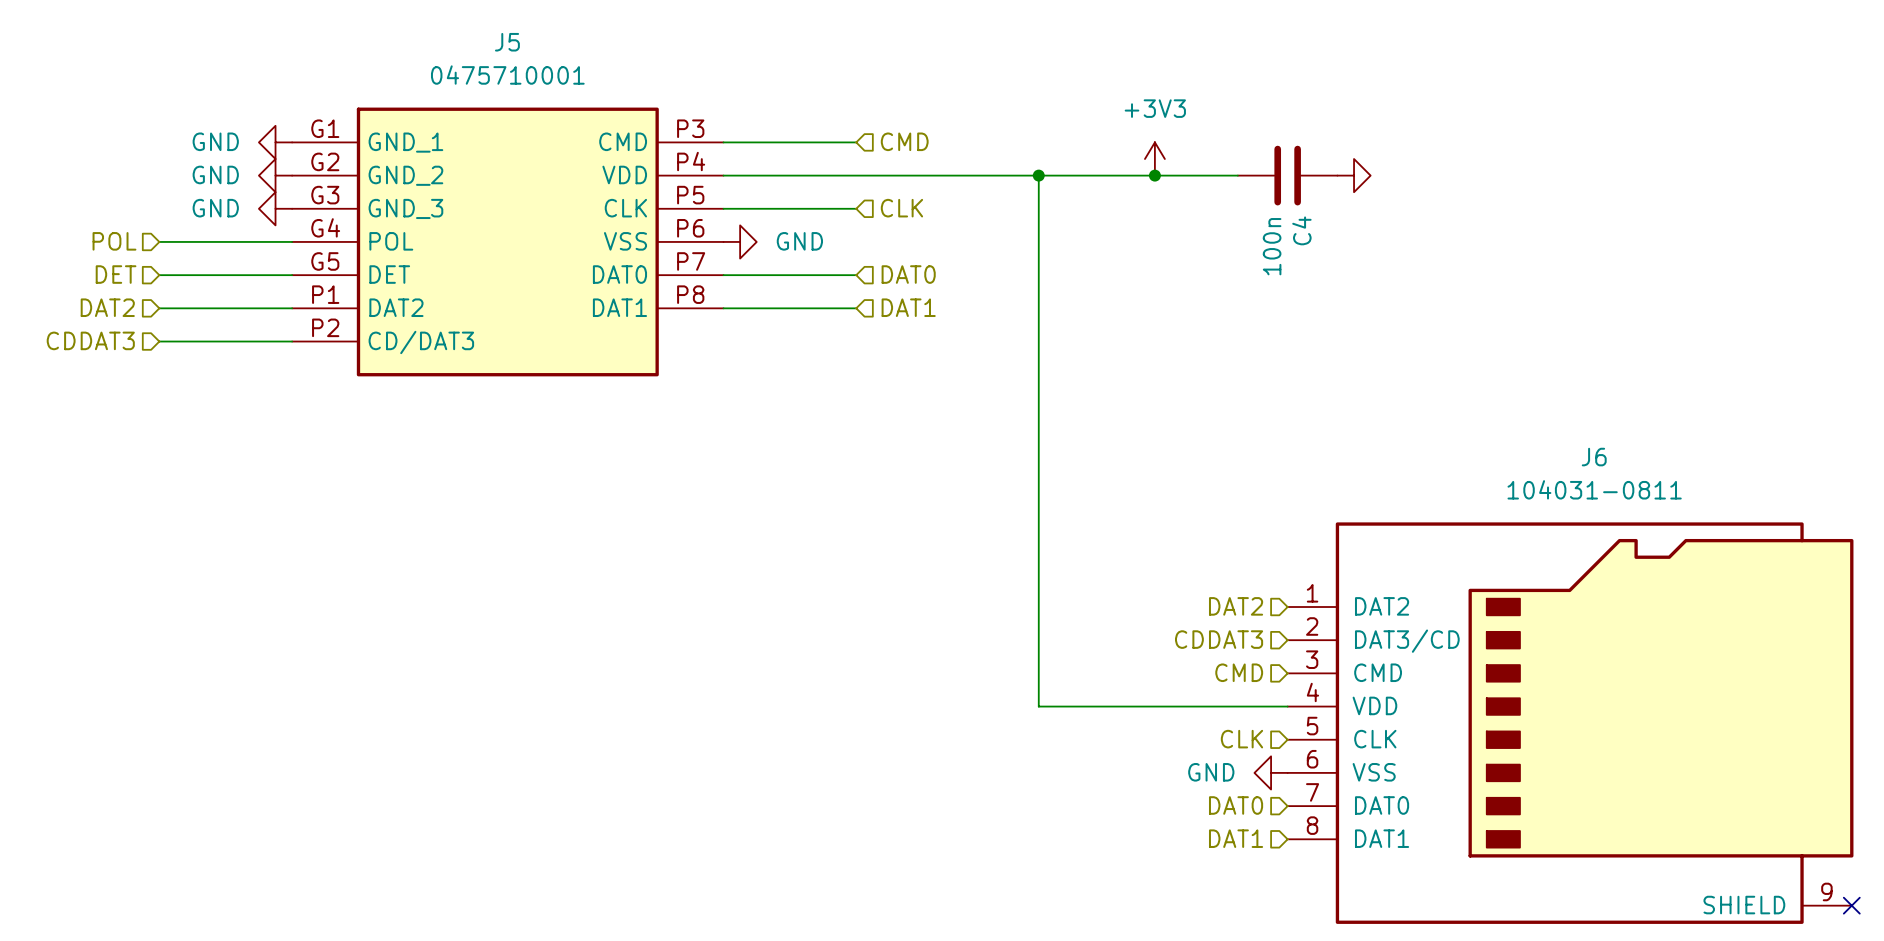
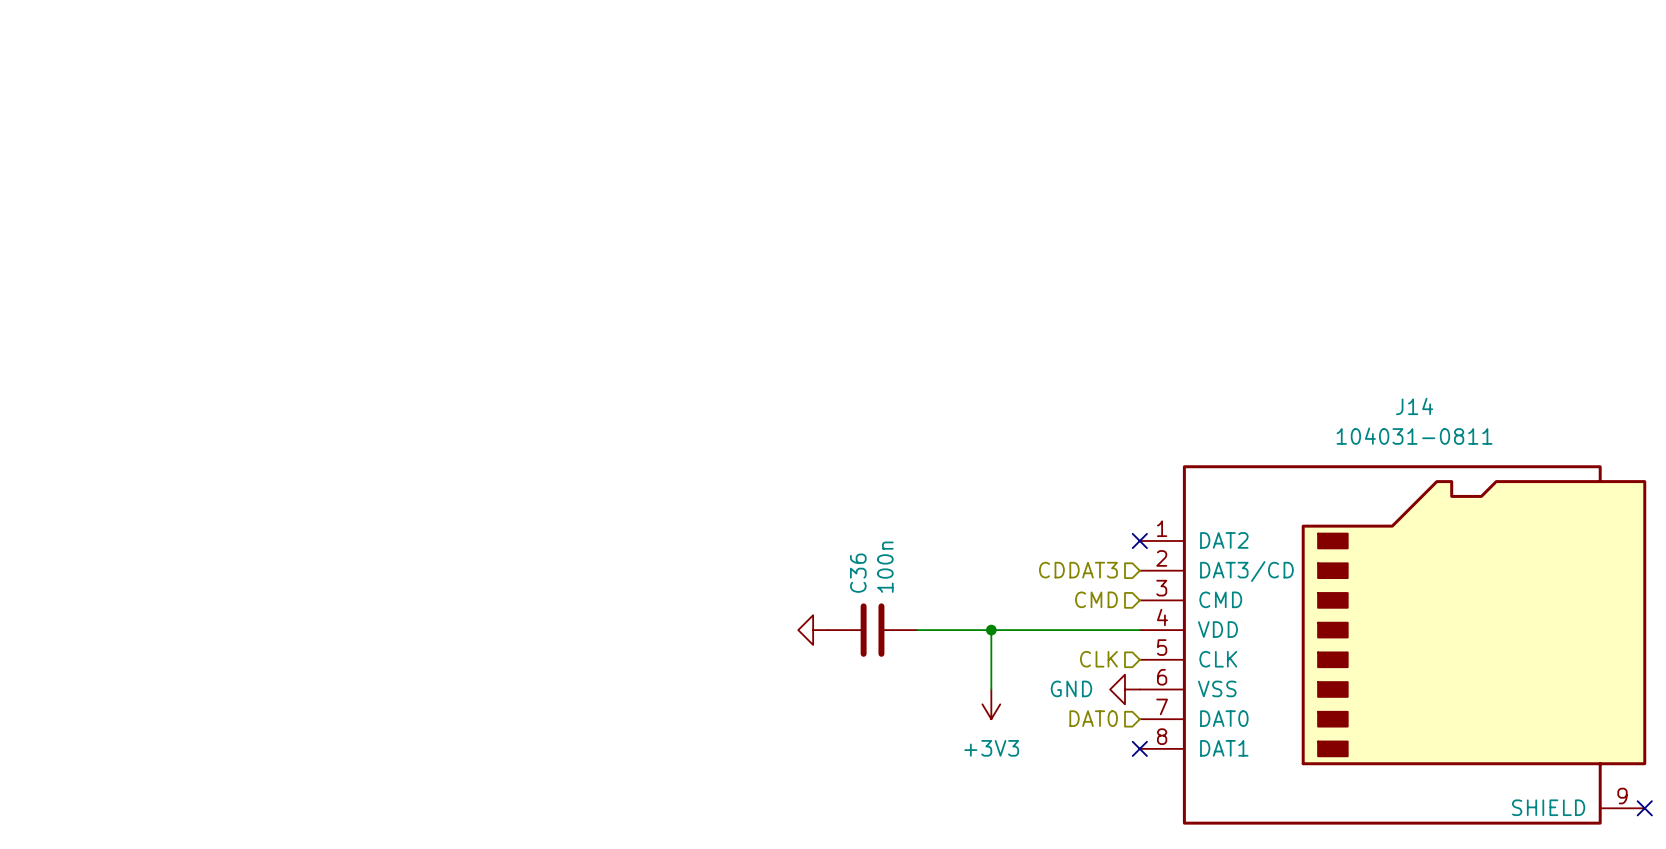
hierarchical label: CMD (904, 141) -> none
power symbol: GND (275, 142) -> none
wire: (723, 142) (856, 142) -> none
power symbol: +3V3 (1154, 159) -> none
power symbol: GND (275, 175) -> none
wire: (723, 175) (1237, 175) -> none
wire: (1038, 175) (1038, 706) -> none
junction: (1038, 175) -> none
junction: (1154, 175) -> none
C4: 100n (1287, 175) -> none
power symbol: (1354, 175) -> none
power symbol: GND (275, 208) -> none
wire: (723, 208) (856, 208) -> none
hierarchical label: CLK (901, 208) -> none
hierarchical label: POL (114, 241) -> none
wire: (159, 241) (292, 241) -> none
J5: 0475710001 (507, 241) -> none
power symbol: GND (740, 241) -> none
hierarchical label: DET (116, 274) -> none
hierarchical label: DAT0 (908, 274) -> none
wire: (159, 275) (292, 275) -> none
wire: (723, 275) (856, 275) -> none
hierarchical label: DAT2 (107, 307) -> none
hierarchical label: DAT1 (908, 307) -> none
wire: (159, 308) (292, 308) -> none
wire: (723, 308) (856, 308) -> none
hierarchical label: CDDAT3 (90, 340) -> none
wire: (159, 341) (292, 341) -> none
J6 name: J6 (1594, 457) -> J14 (1414, 406)
hierarchical label: DAT2 (1236, 606) -> none
no-connect mark: none -> (1139, 540)
power symbol: none -> (813, 630)
C36: none -> 100n (872, 630)
wire: none -> (991, 630) (991, 689)
junction: none -> (991, 630)
power symbol: none -> +3V3 (991, 704)
hierarchical label: DAT1 (1236, 838) -> none
no-connect mark: none -> (1139, 748)

